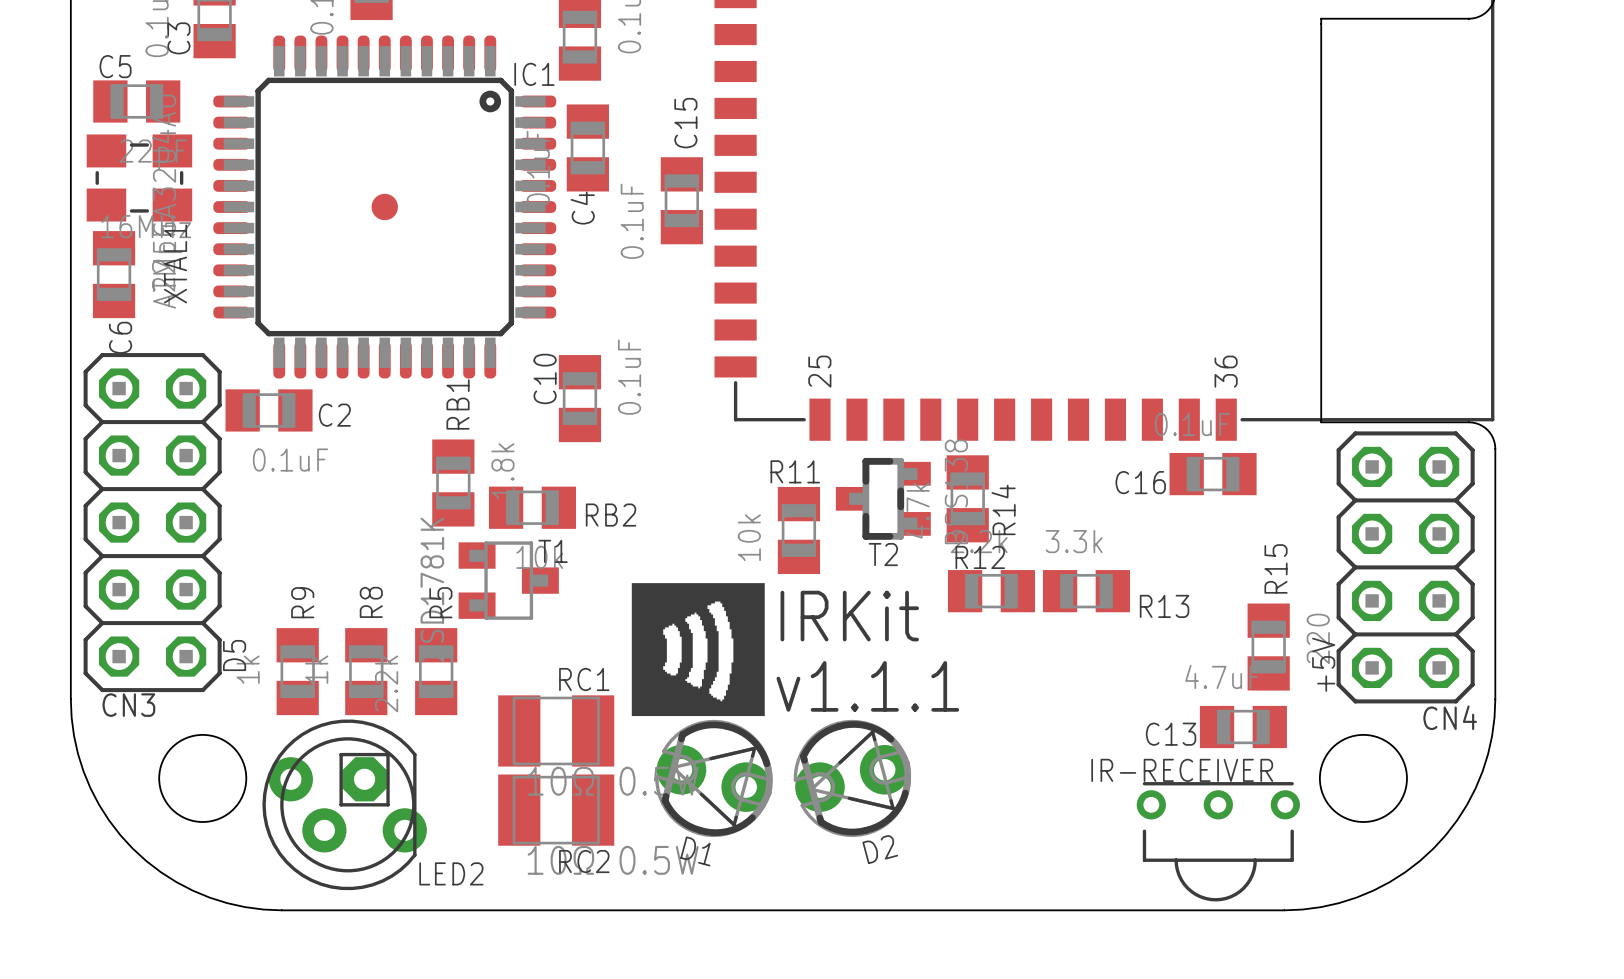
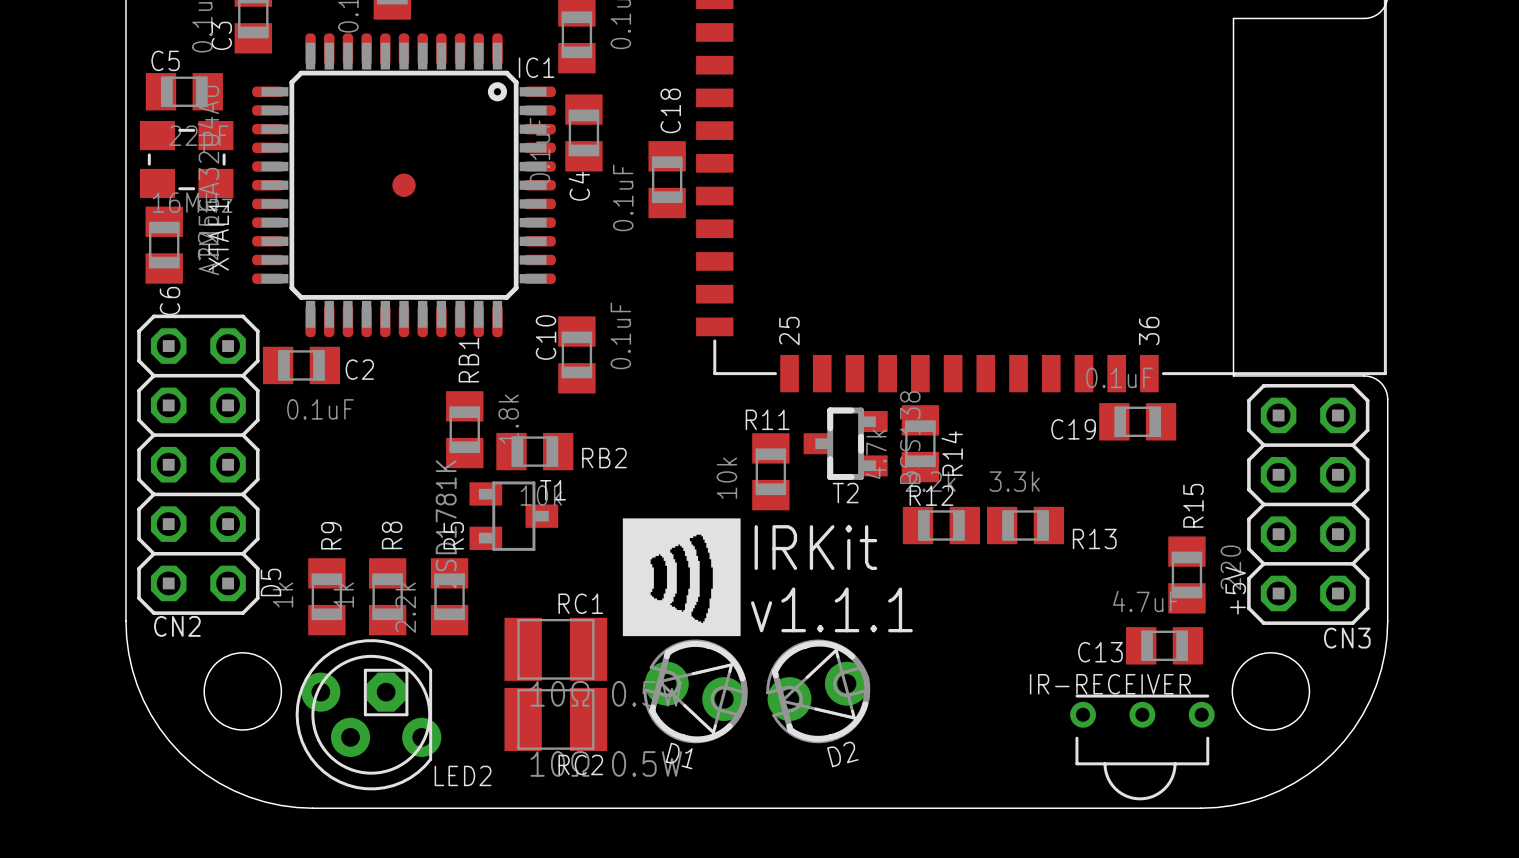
C15 name: C15 (685, 123) -> C18 (670, 110)
C16 name: C16 (1140, 482) -> C19 (1073, 429)
CN3 name: CN3 (128, 705) -> CN2 (177, 626)
CN4 name: CN4 (1450, 717) -> CN3 (1347, 638)

